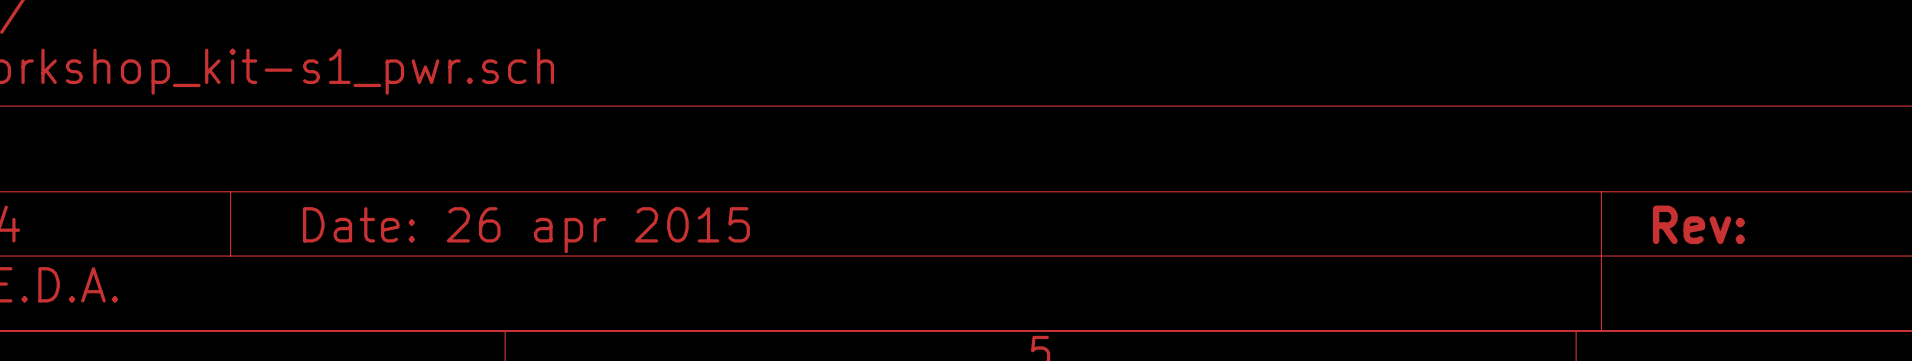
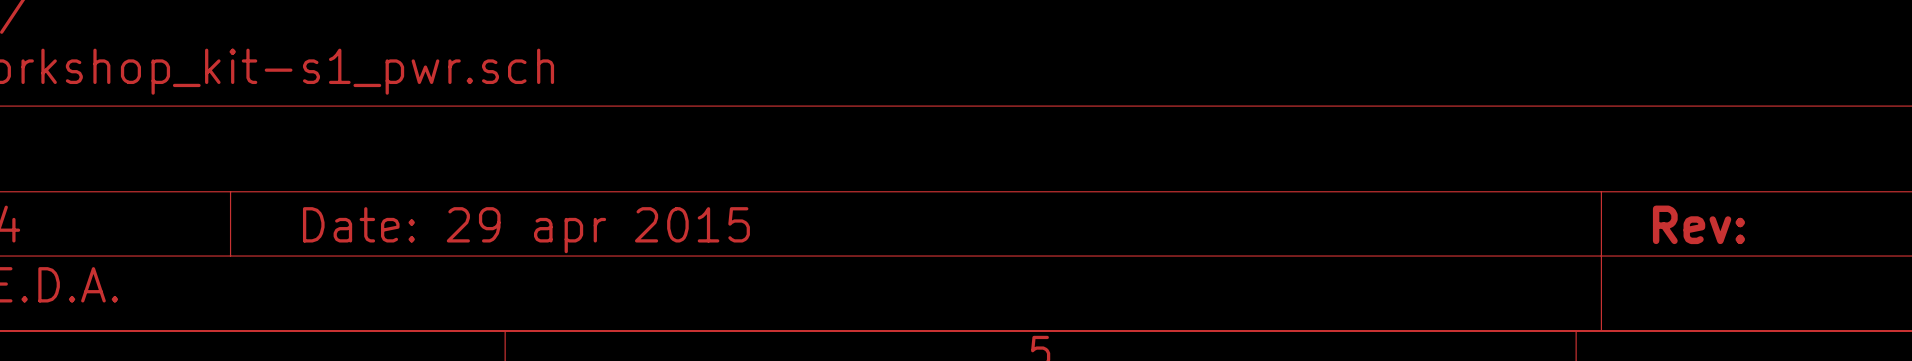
title block: Date: 26 apr 2015 (526, 230) -> Date: 29 apr 2015 (526, 230)

